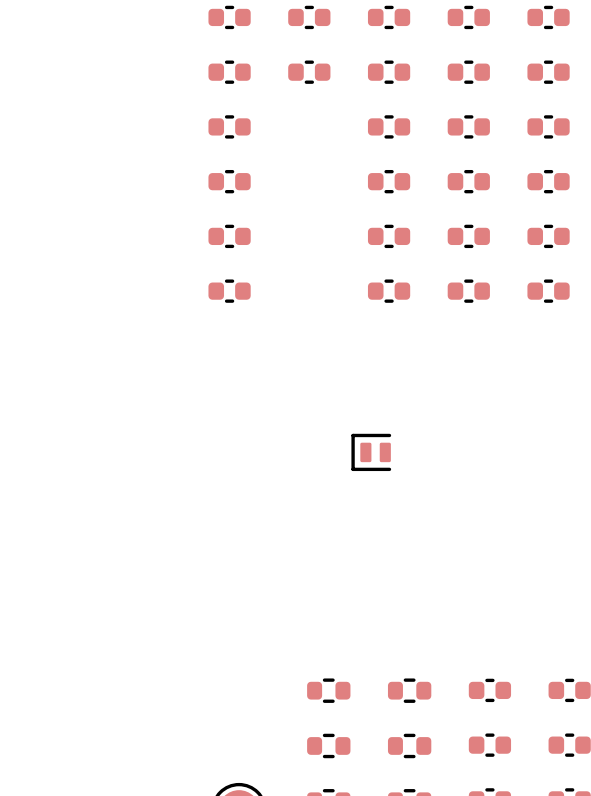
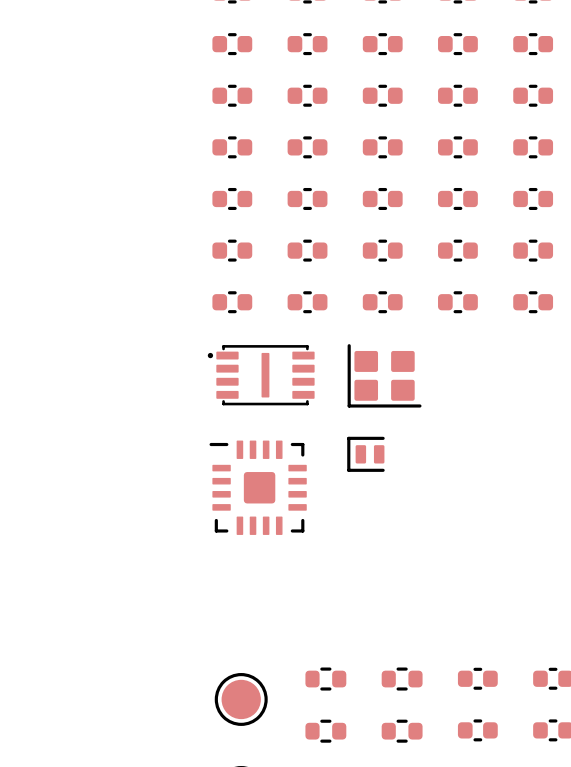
part: none -> (307, 147)
part: none -> (307, 198)
part: none -> (307, 250)
part: none -> (307, 302)
part: none -> (261, 375)
part: none -> (384, 375)
part: none -> (258, 487)
part: none -> (241, 699)

